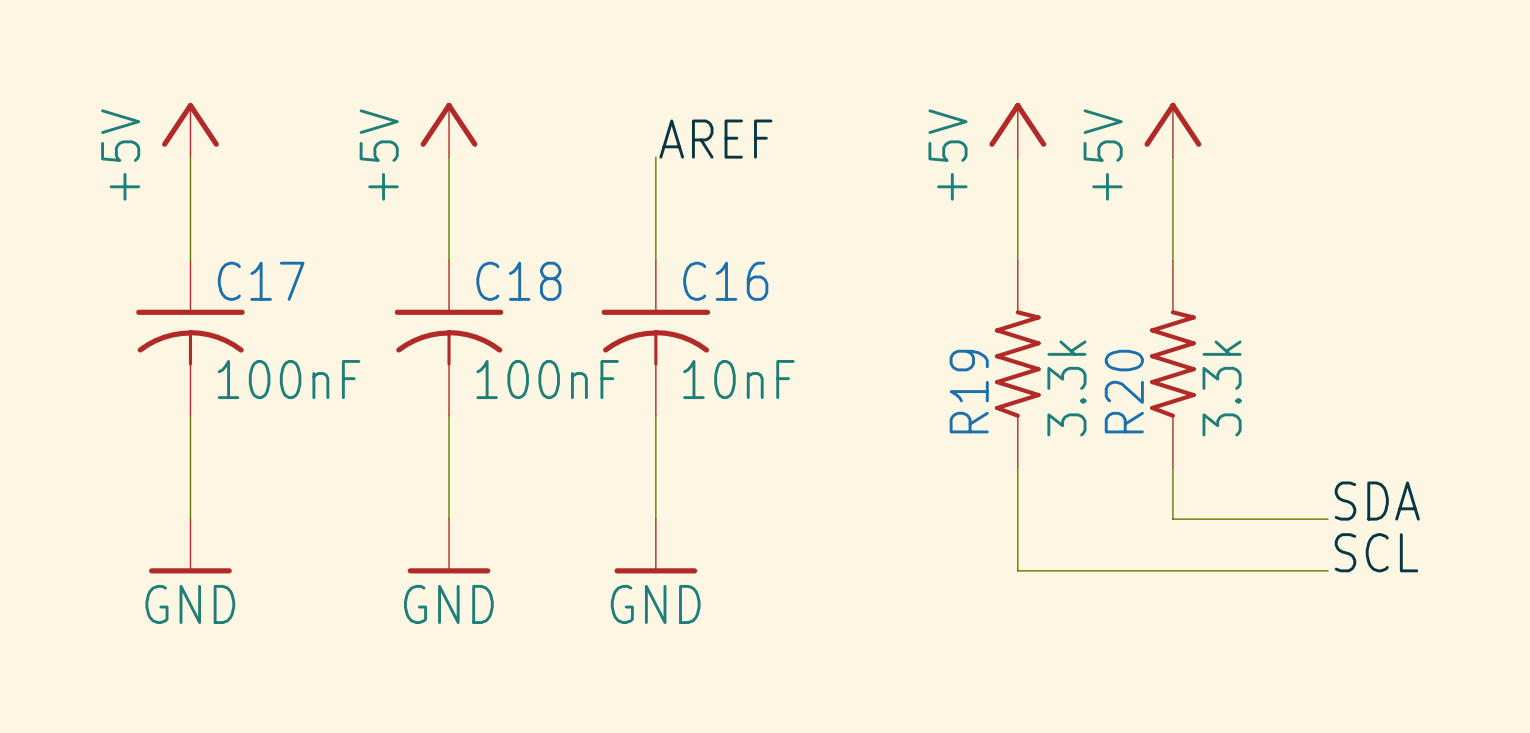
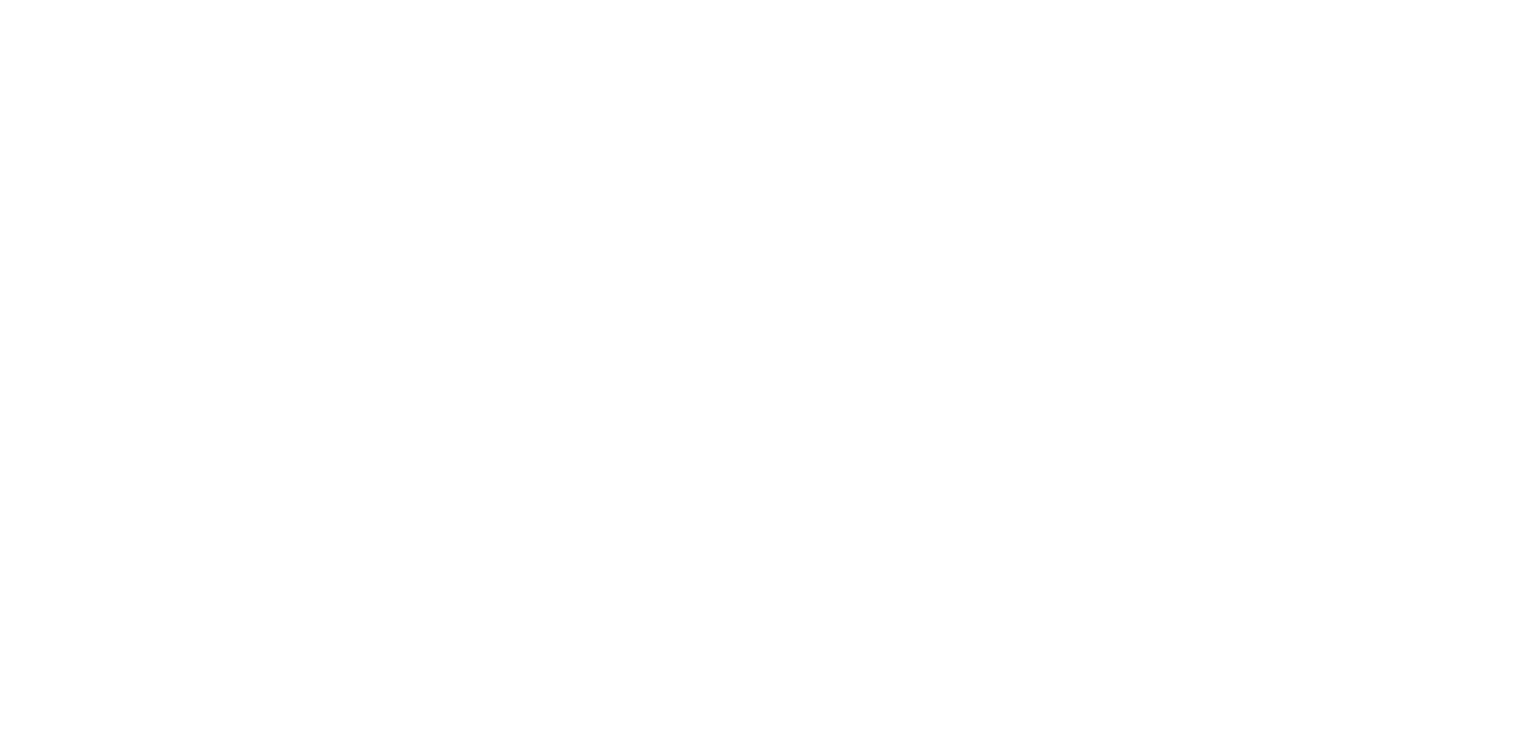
power symbol: +5V (190, 130) -> none
power symbol: +5V (449, 130) -> none
power symbol: +5V (1017, 130) -> none
power symbol: +5V (1172, 130) -> none
label: AREF (715, 139) -> none
wire: (190, 157) (190, 260) -> none
wire: (449, 157) (449, 260) -> none
wire: (655, 157) (655, 260) -> none
wire: (1017, 157) (1017, 260) -> none
wire: (1172, 157) (1172, 260) -> none
C17: 100nF (190, 338) -> none
C18: 100nF (449, 338) -> none
C16: 10nF (655, 338) -> none
R19: 3.3k (1017, 364) -> none
R20: 3.3k (1172, 364) -> none
wire: (190, 415) (190, 519) -> none
wire: (449, 415) (449, 519) -> none
wire: (655, 415) (655, 519) -> none
wire: (1017, 467) (1017, 570) (1328, 570) -> none
wire: (1172, 467) (1172, 519) (1328, 519) -> none
label: SDA (1377, 501) -> none
power symbol: GND (190, 546) -> none
power symbol: GND (449, 546) -> none
power symbol: GND (655, 546) -> none
label: SCL (1376, 552) -> none

